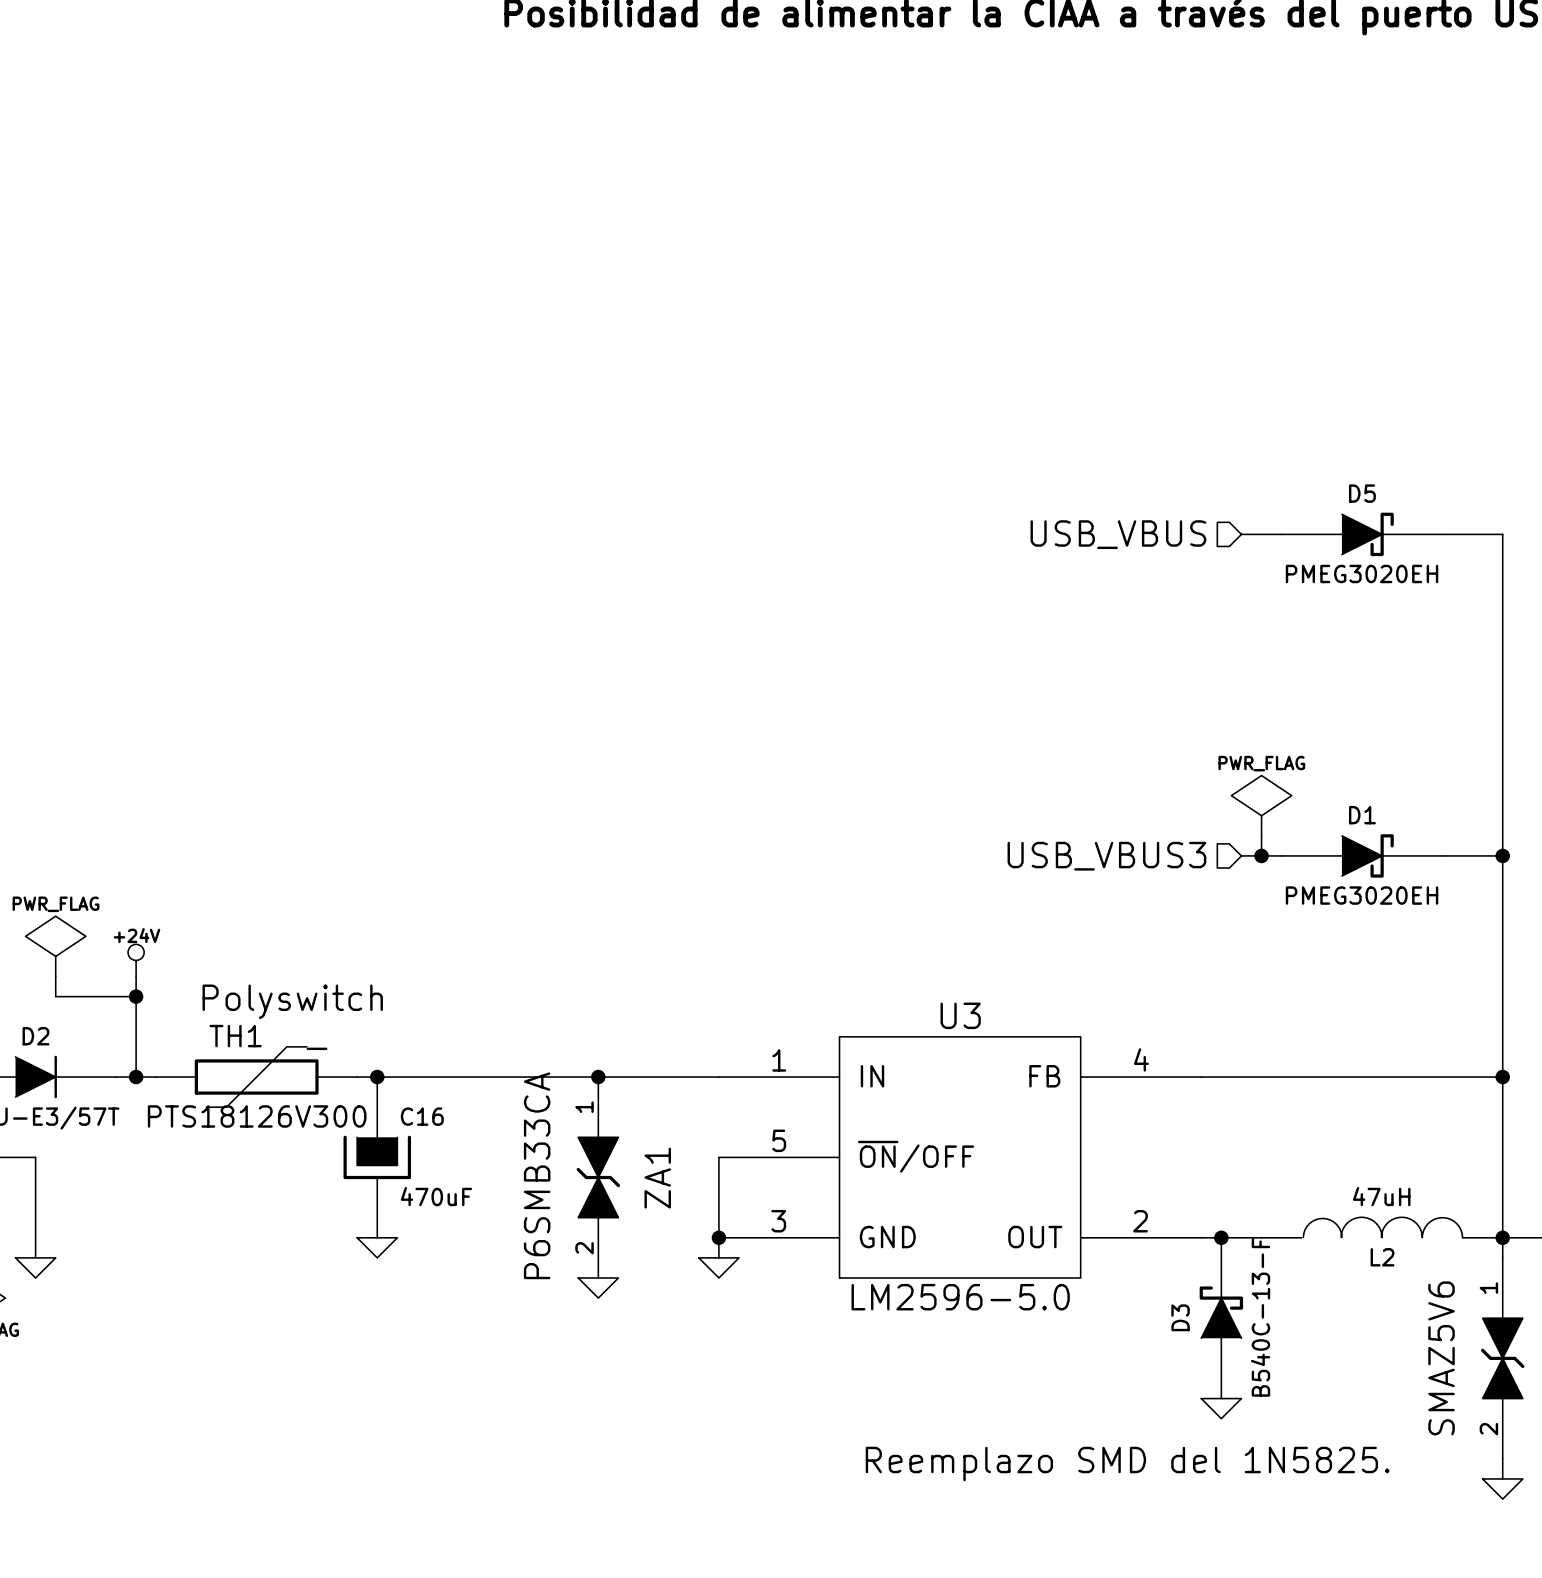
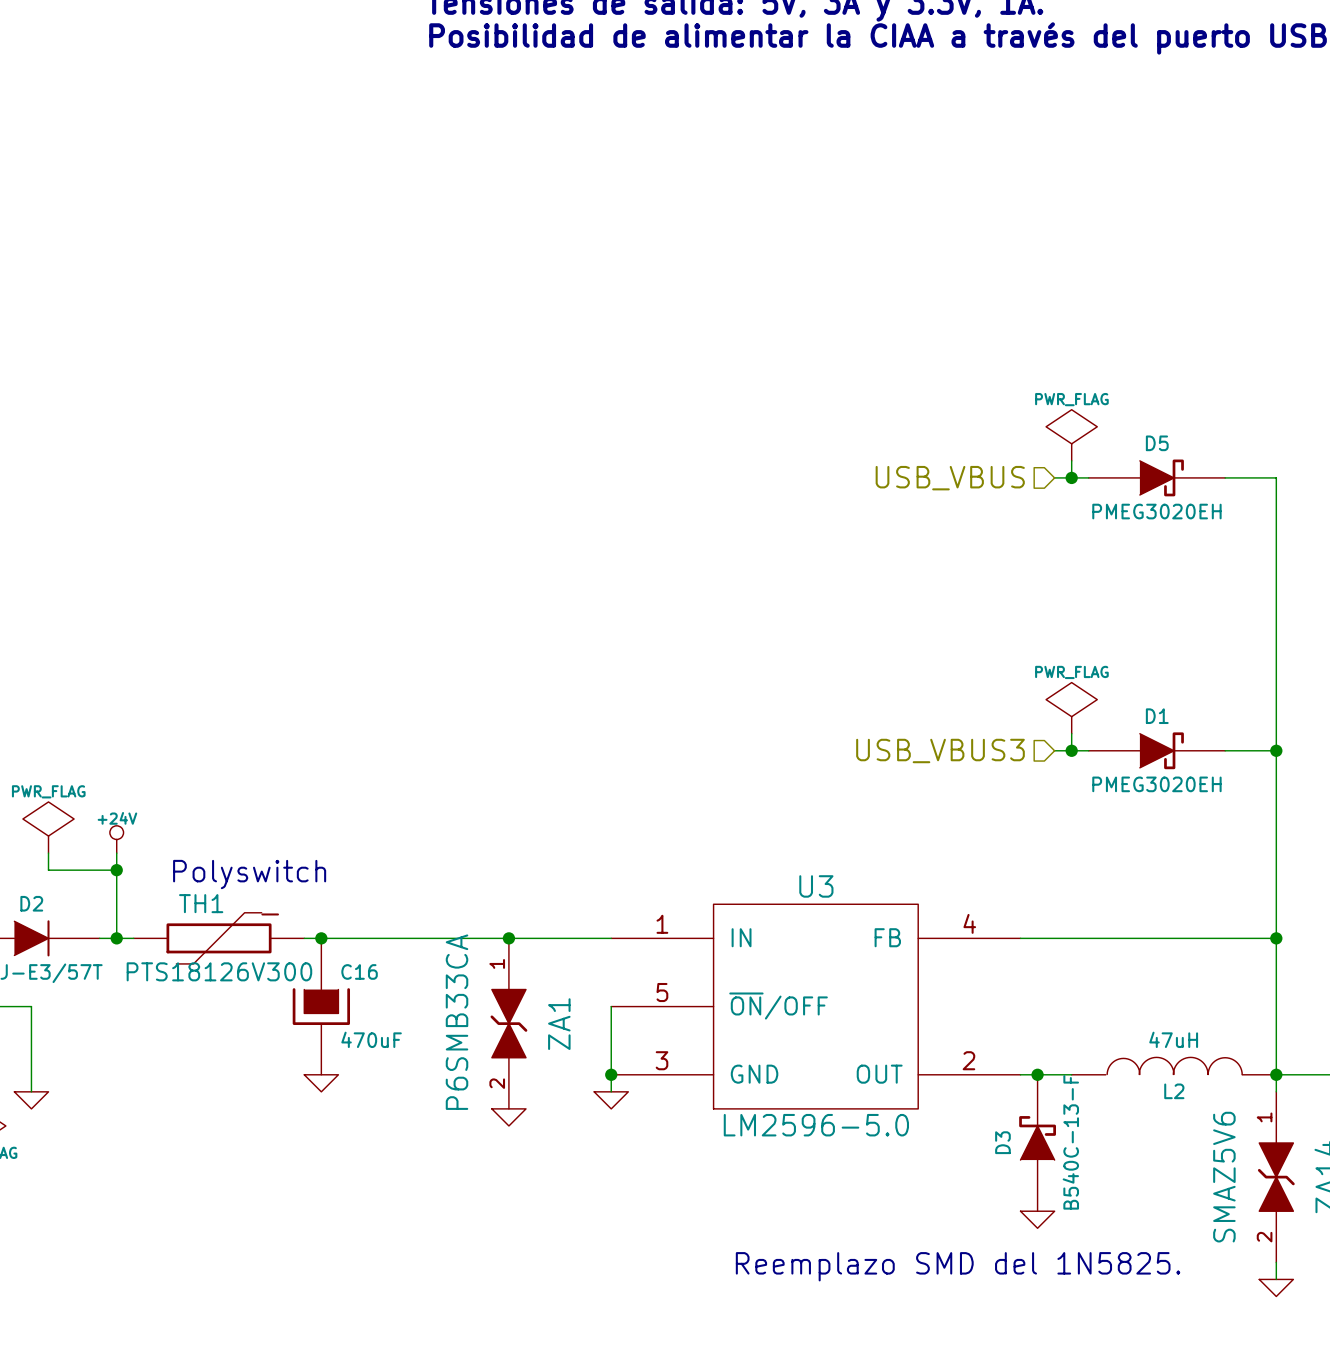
power symbol: none -> PWR_FLAG (1071, 435)
wire: none -> (1071, 460) (1071, 477)
junction: none -> (1071, 477)

